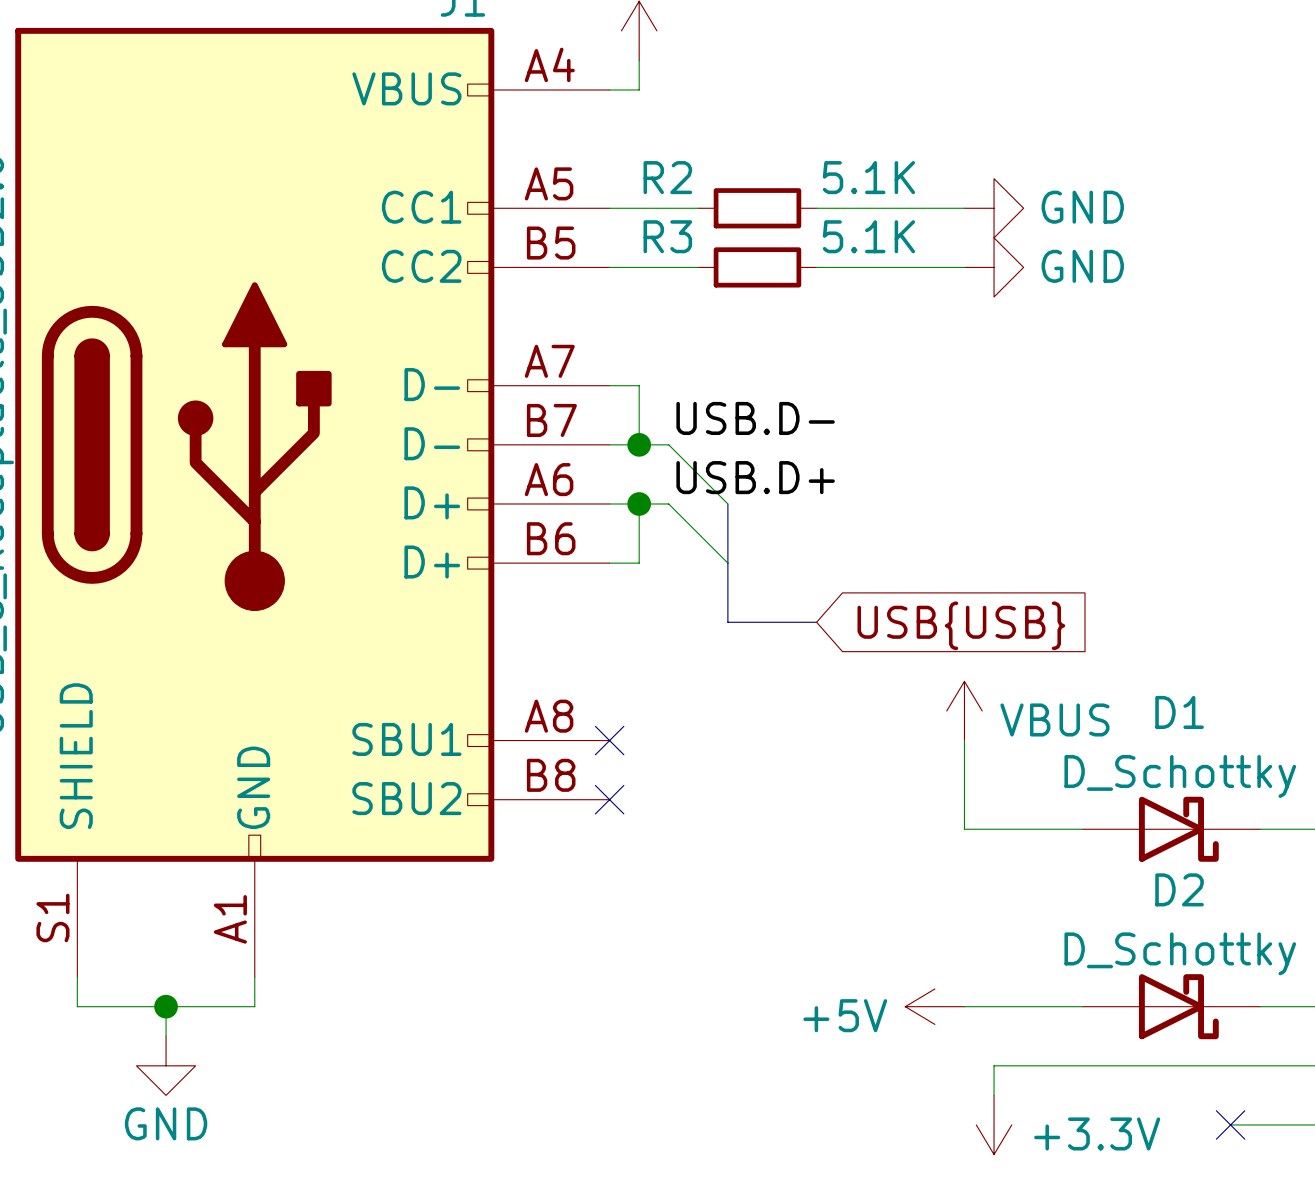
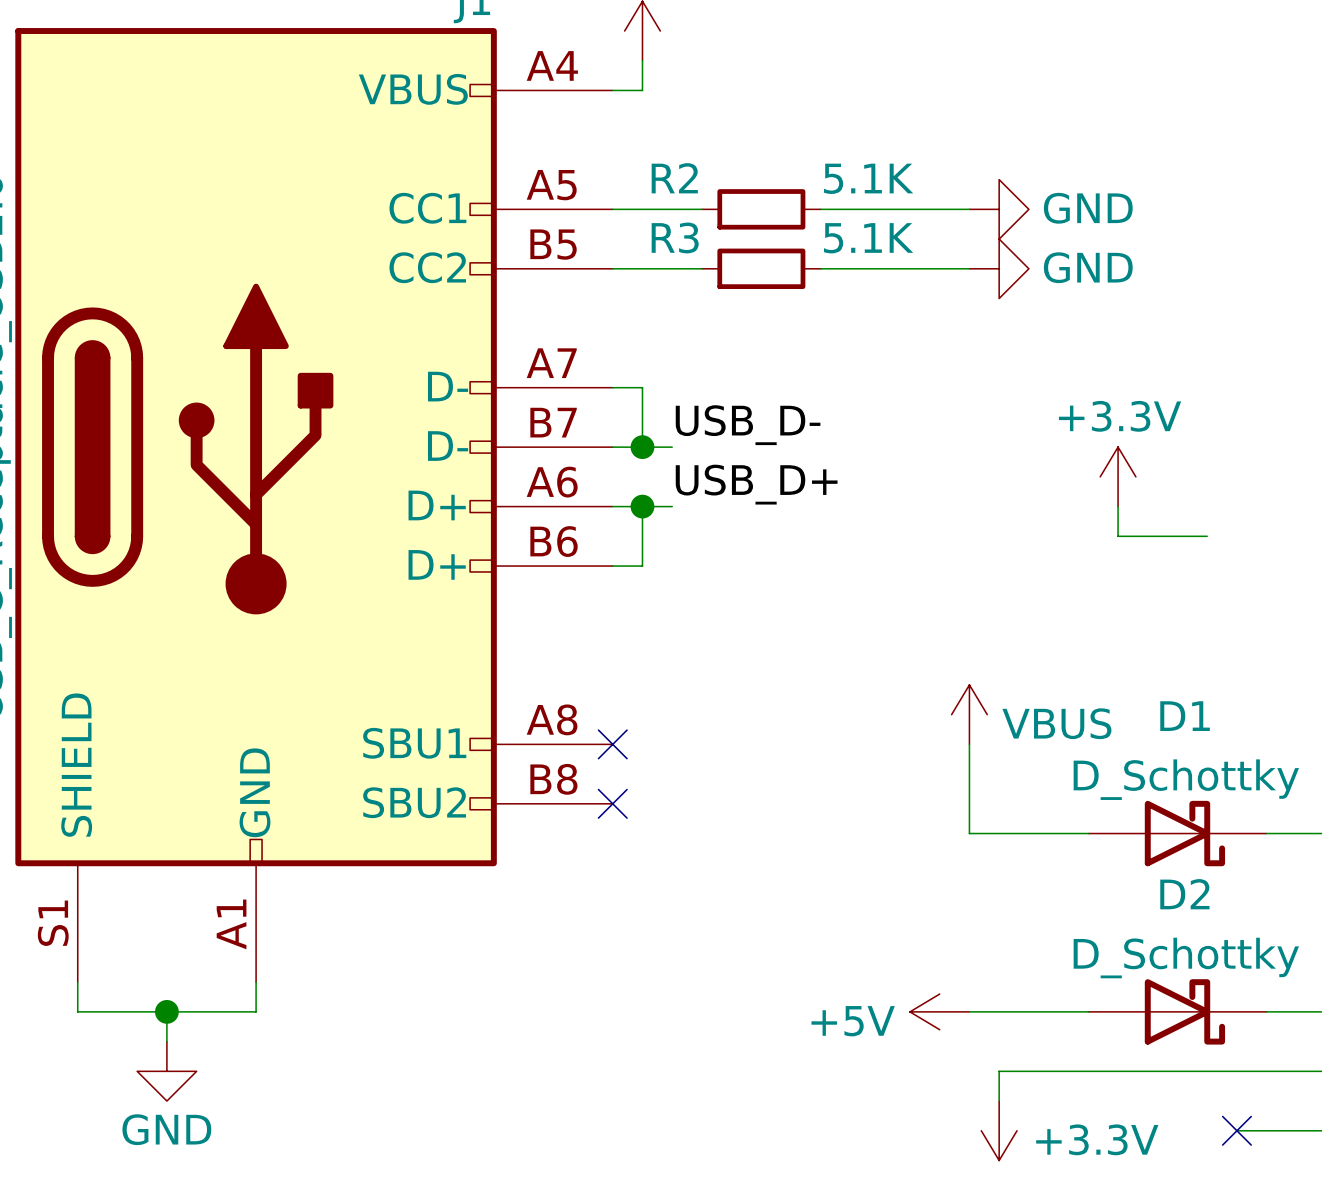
label: USB.D- (755, 418) -> USB_D- (748, 425)
wire: (668, 444) (727, 503) -> none
power symbol: none -> +3.3V (1118, 476)
label: USB.D+ (755, 477) -> USB_D+ (756, 484)
wire: (668, 503) (727, 563) -> none
bus: (727, 503) (727, 622) (816, 622) -> none
wire: none -> (1118, 506) (1118, 536) (1207, 536)
global label: USB{USB} (961, 625) -> none

